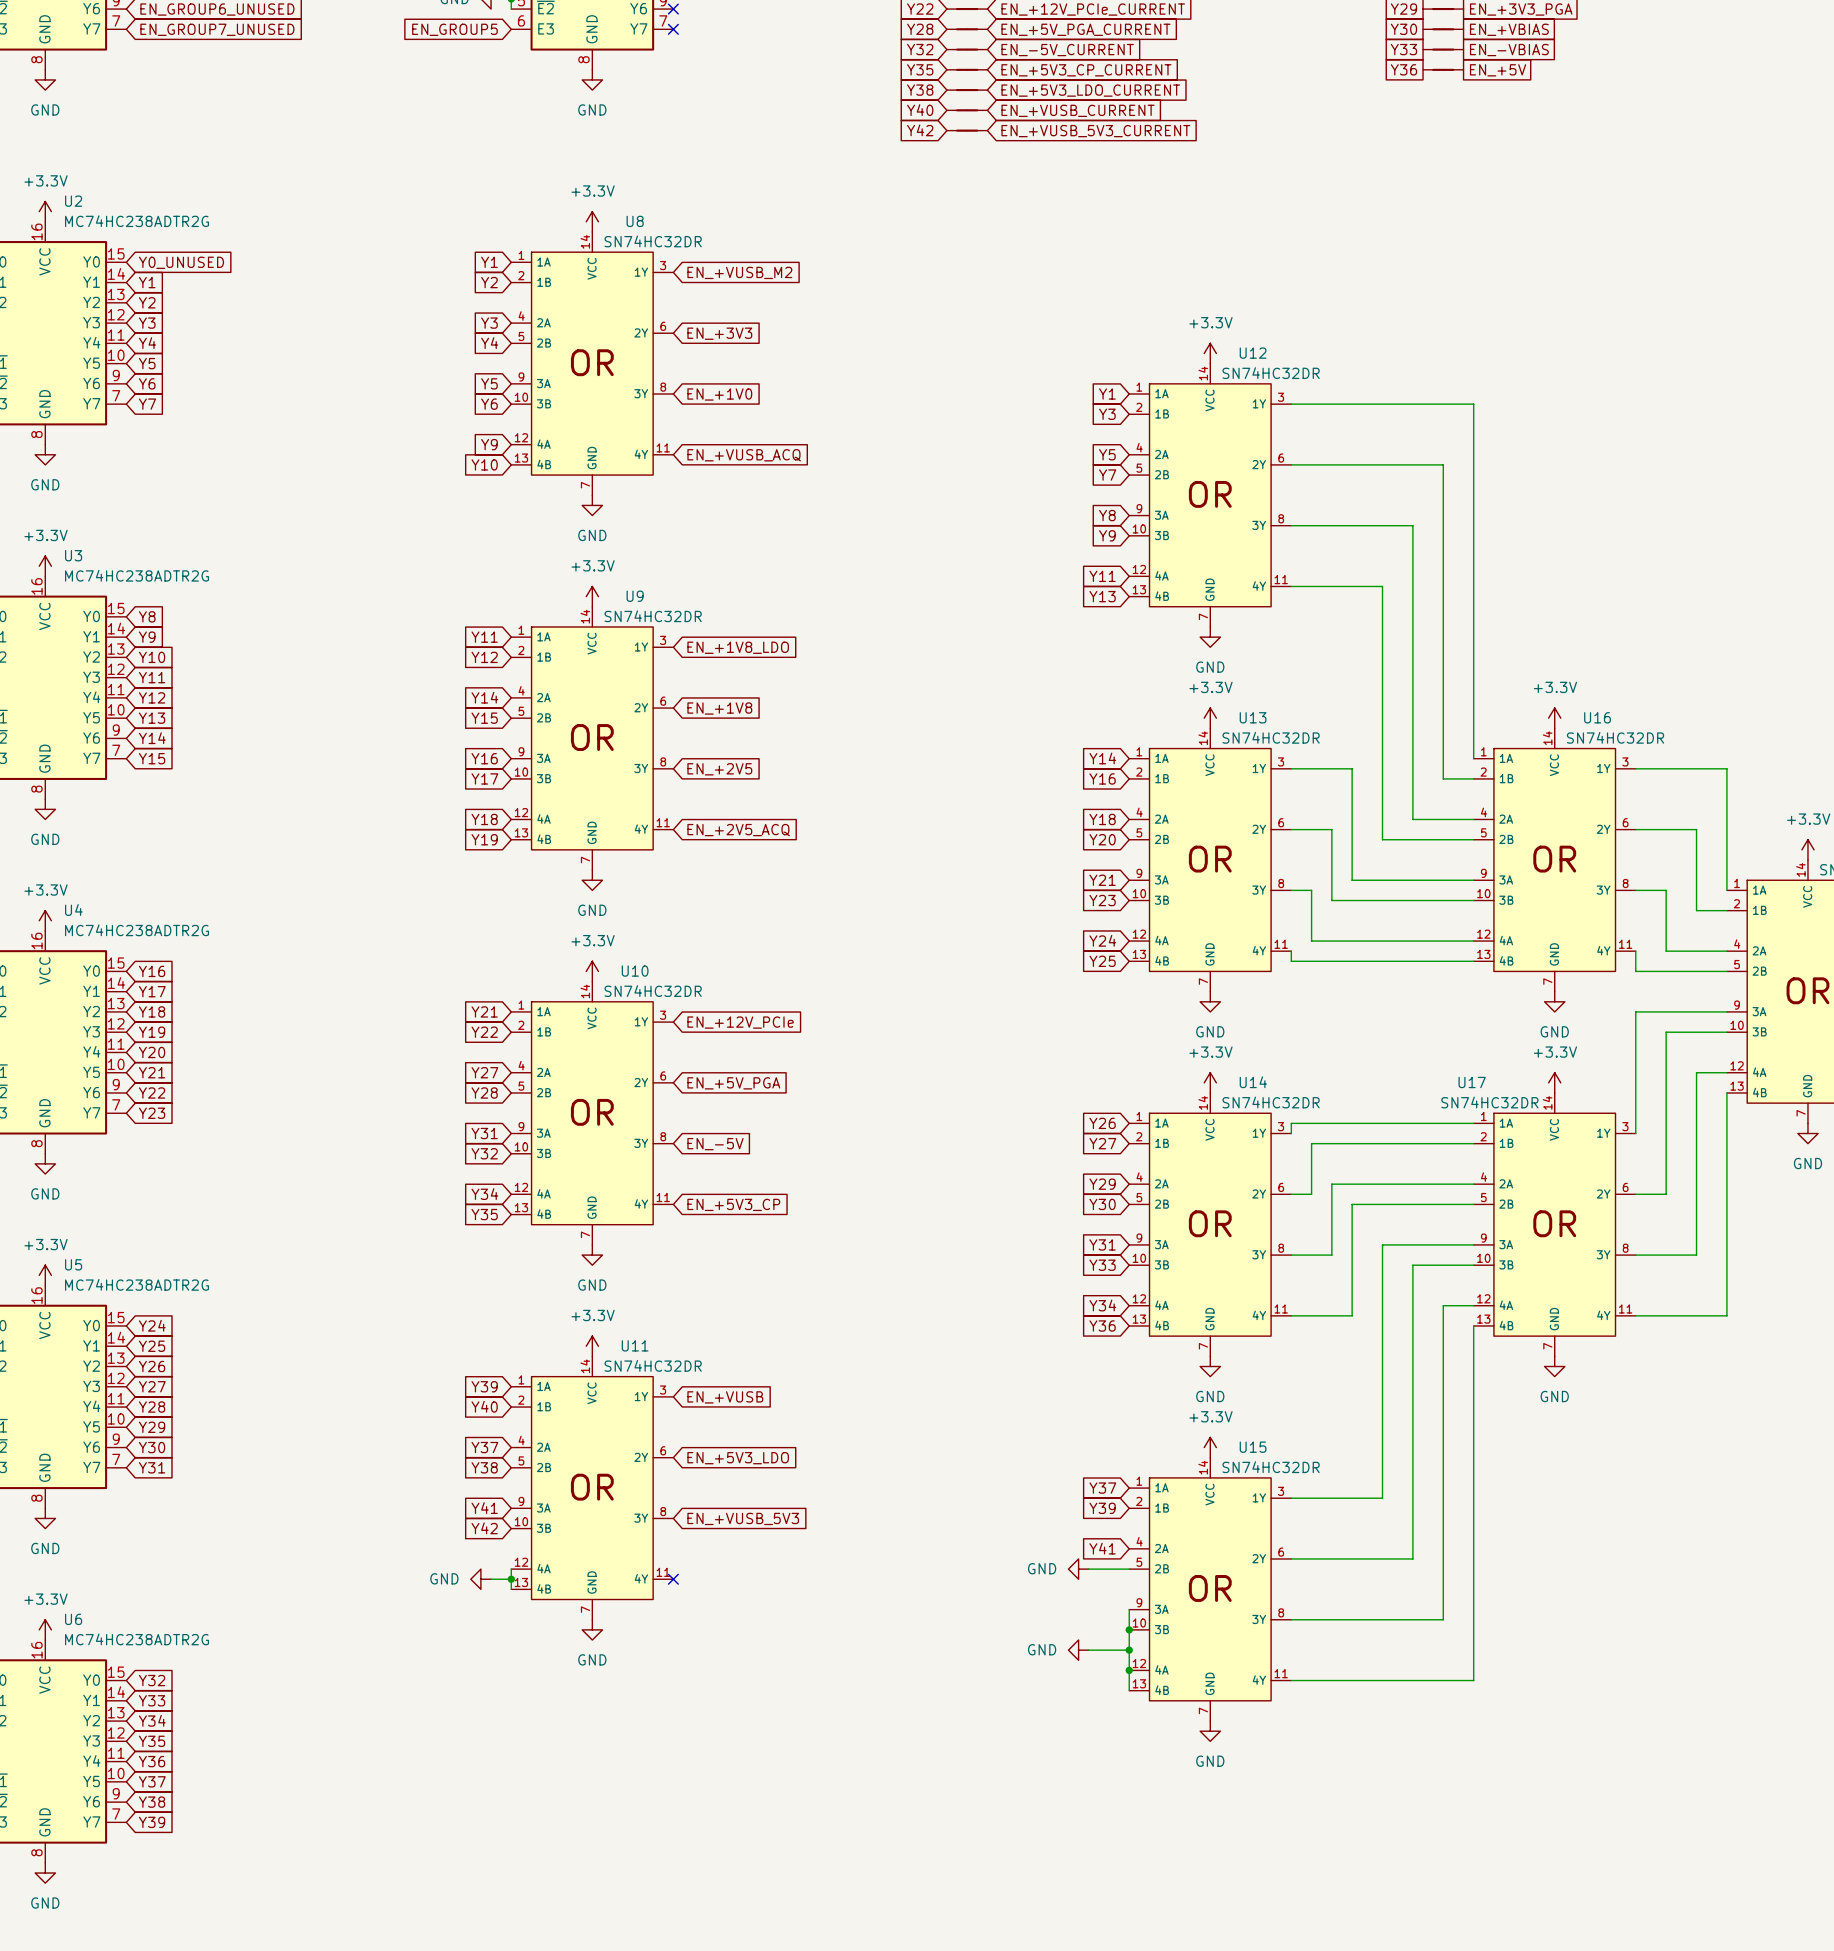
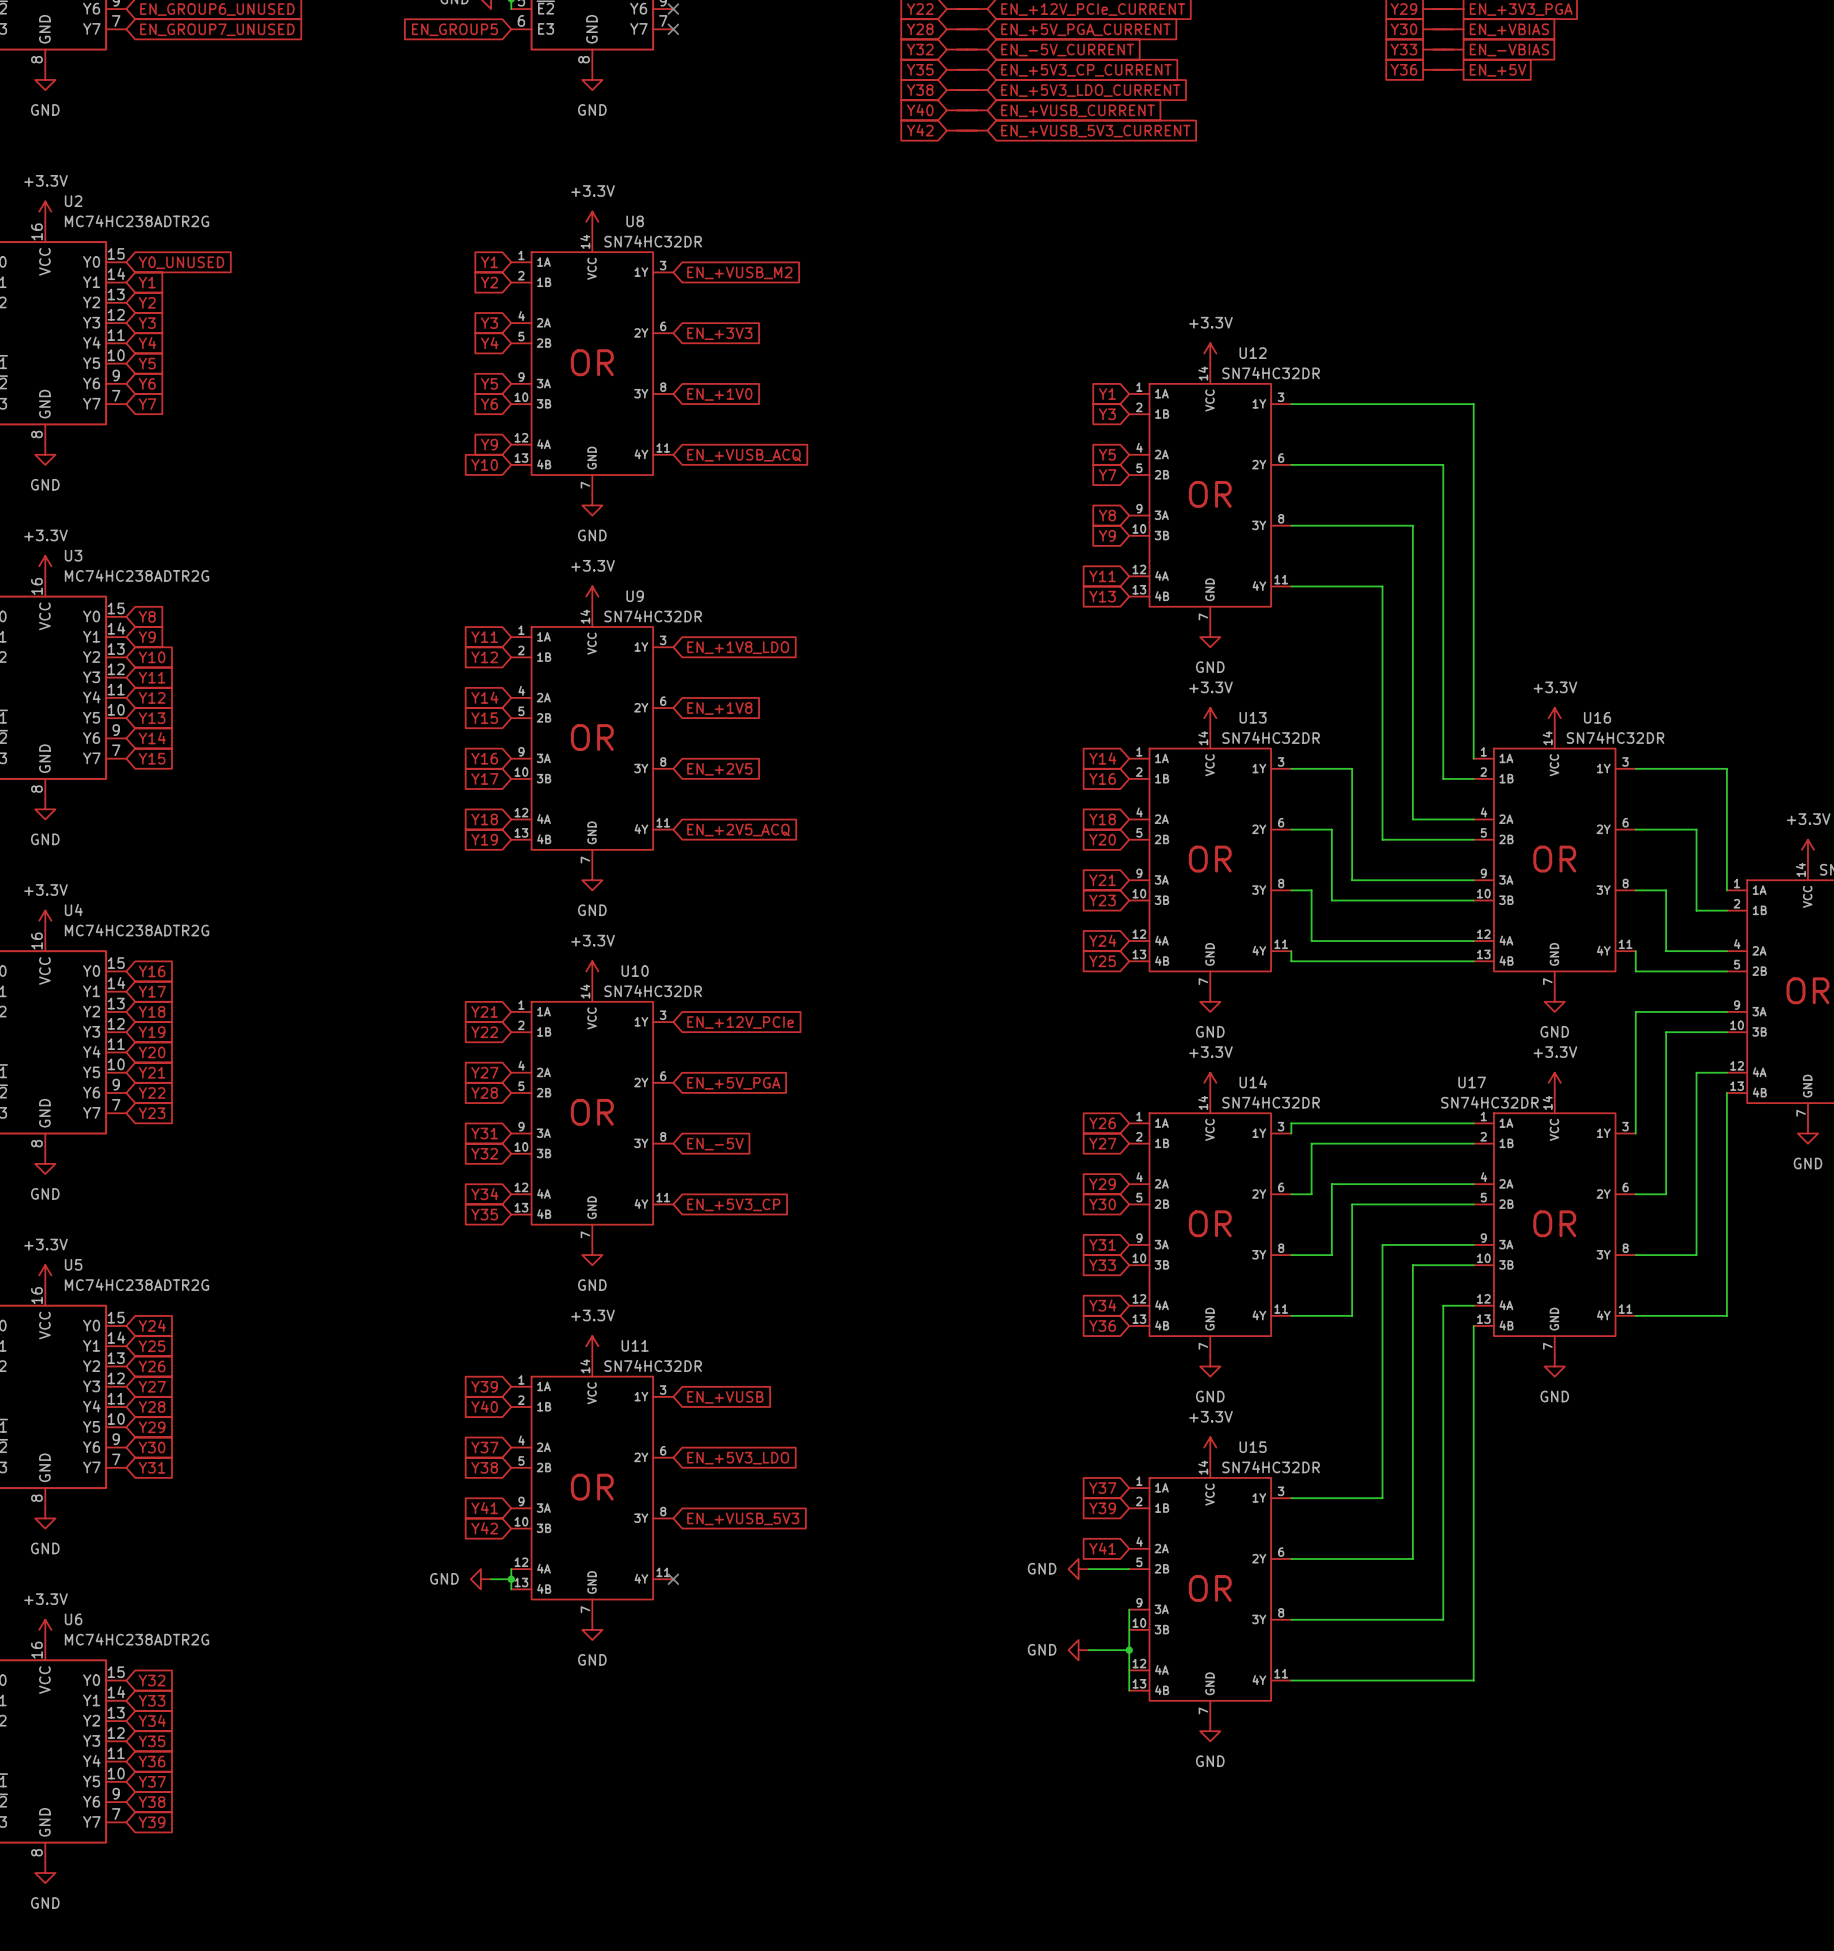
junction: (1129, 1629) -> none
junction: (1129, 1670) -> none

